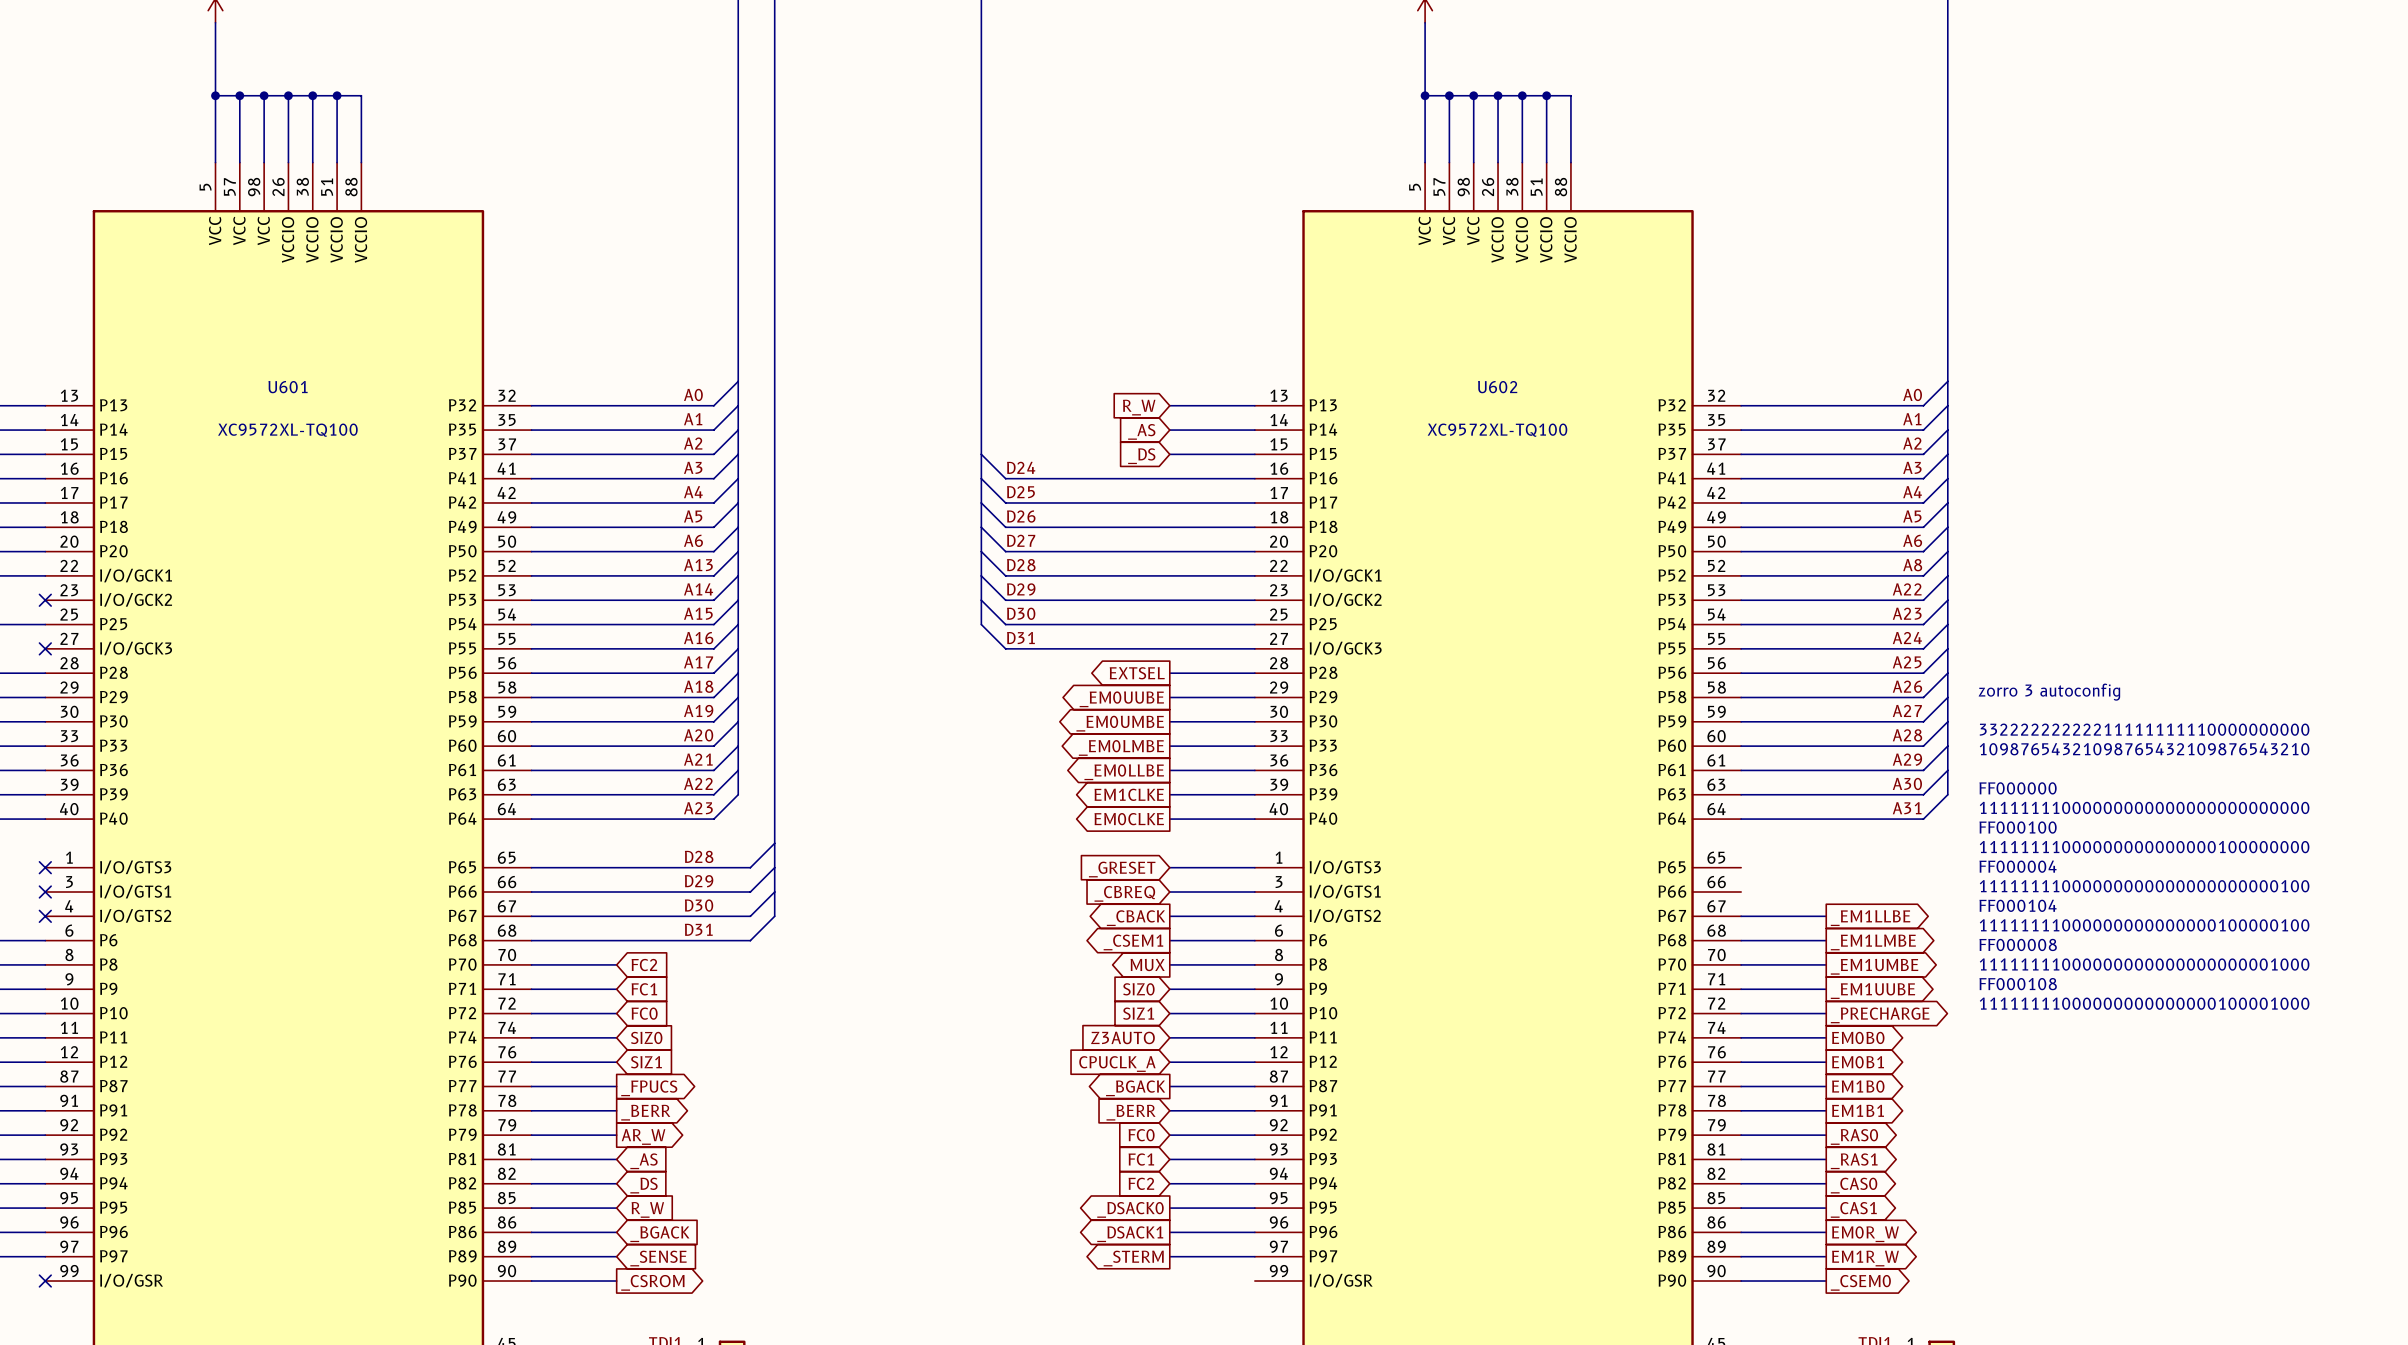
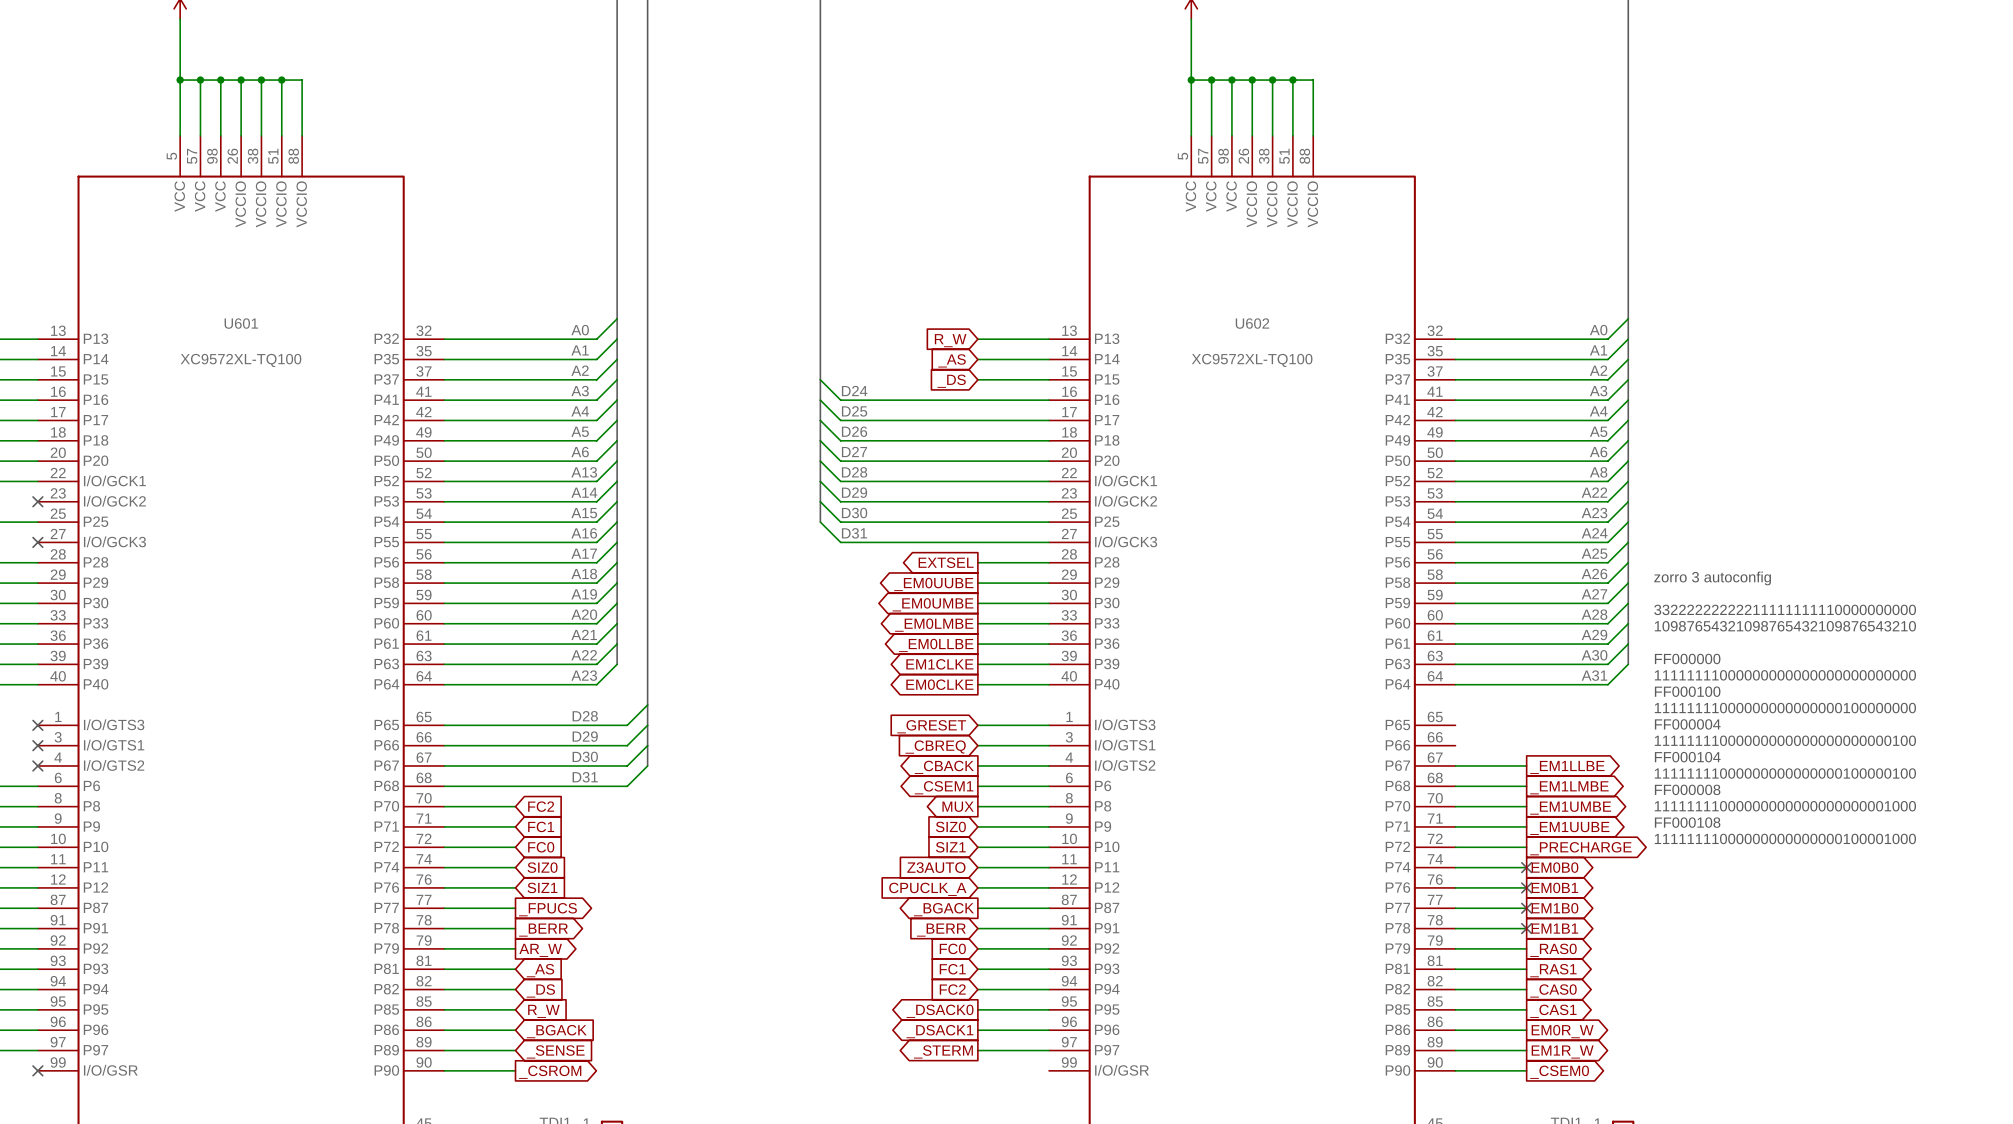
no-connect mark: none -> (1526, 867)
no-connect mark: none -> (1526, 887)
no-connect mark: none -> (1526, 908)
no-connect mark: none -> (1526, 928)

